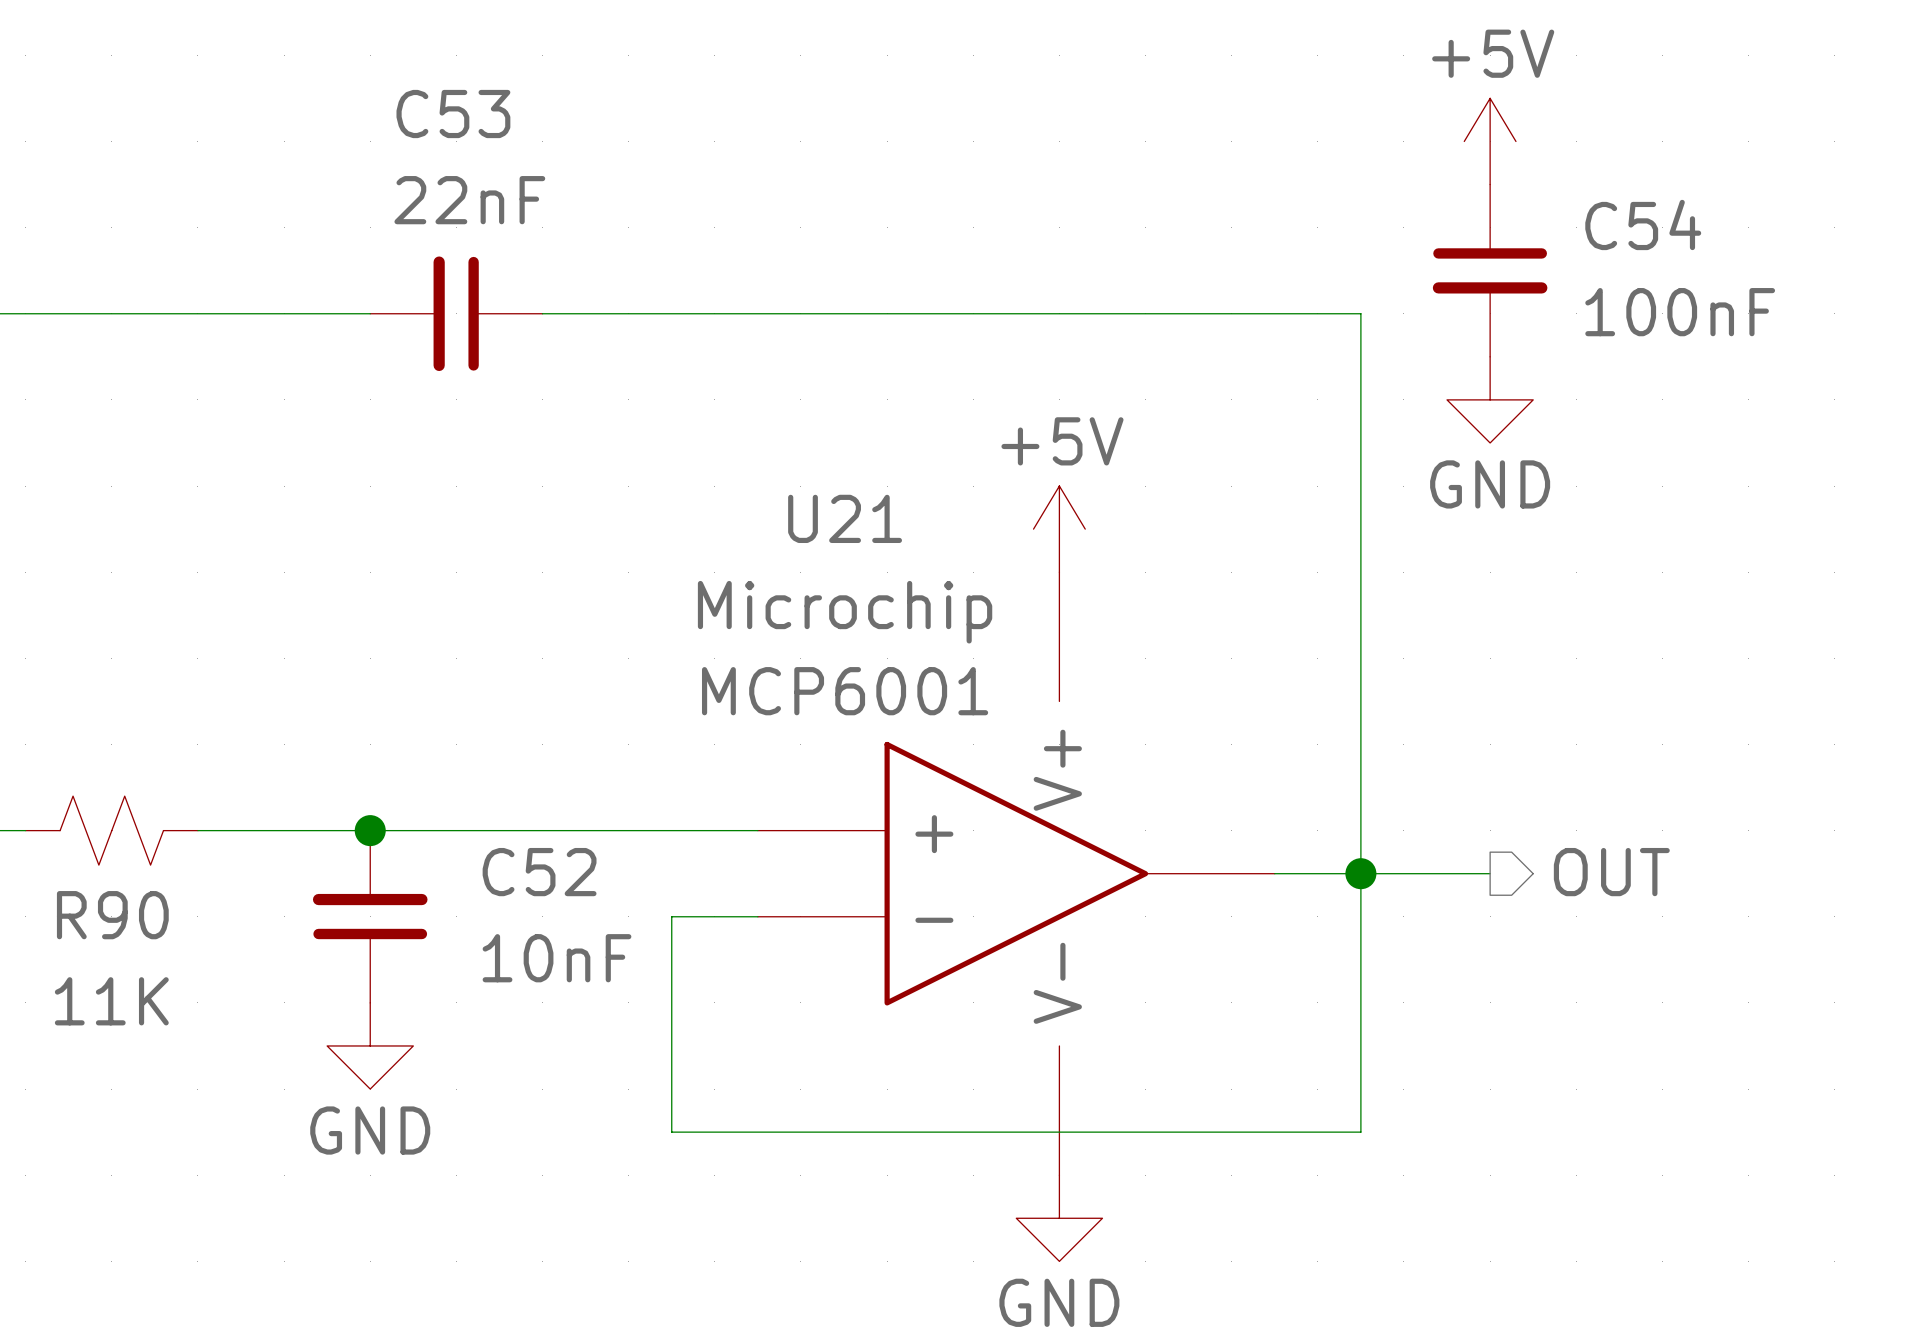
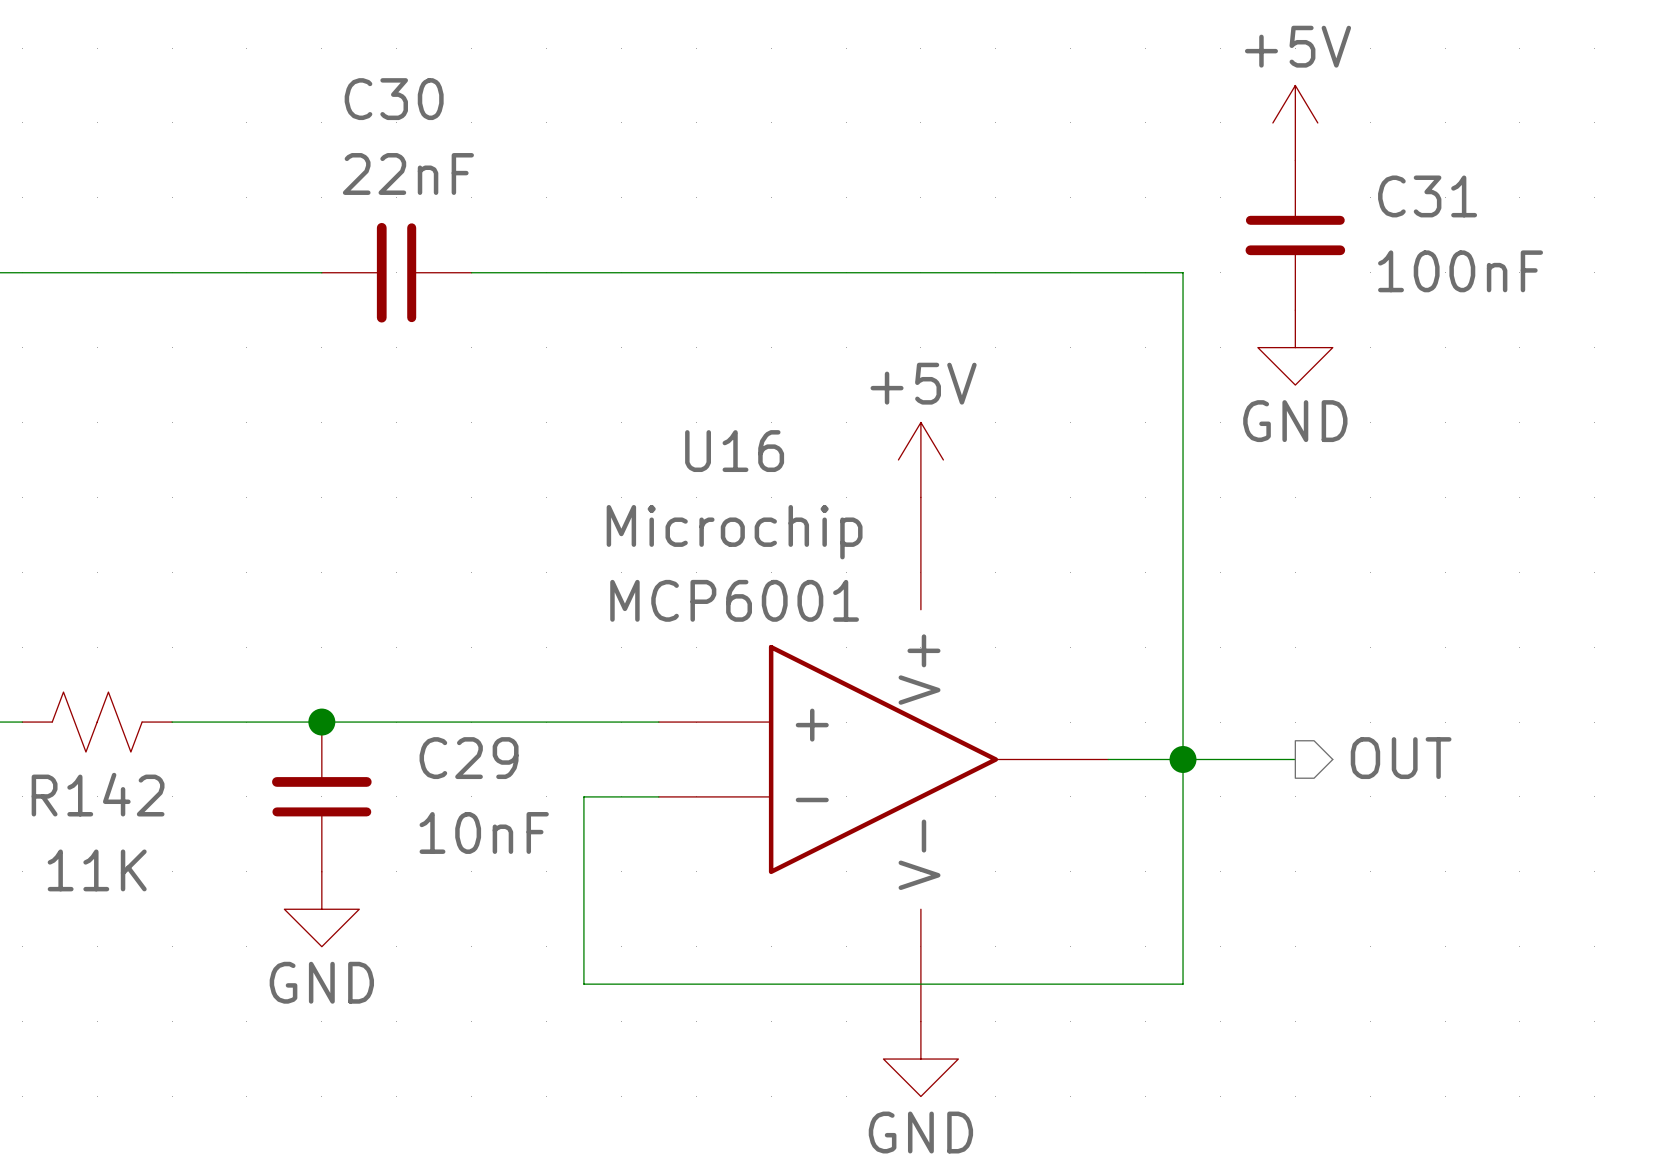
C53 name: C53 (453, 114) -> C30 (394, 99)
C54 name: C54 (1643, 224) -> C31 (1427, 196)
U21 name: U21 (845, 518) -> U16 (734, 451)
C52 name: C52 (539, 872) -> C29 (469, 758)
R90 name: R90 (112, 915) -> R142 (98, 794)

